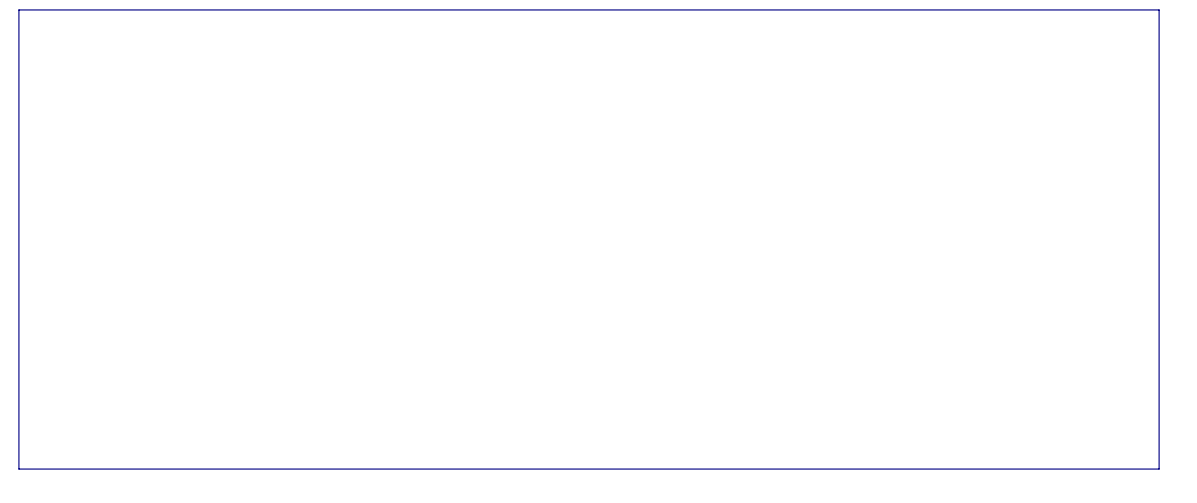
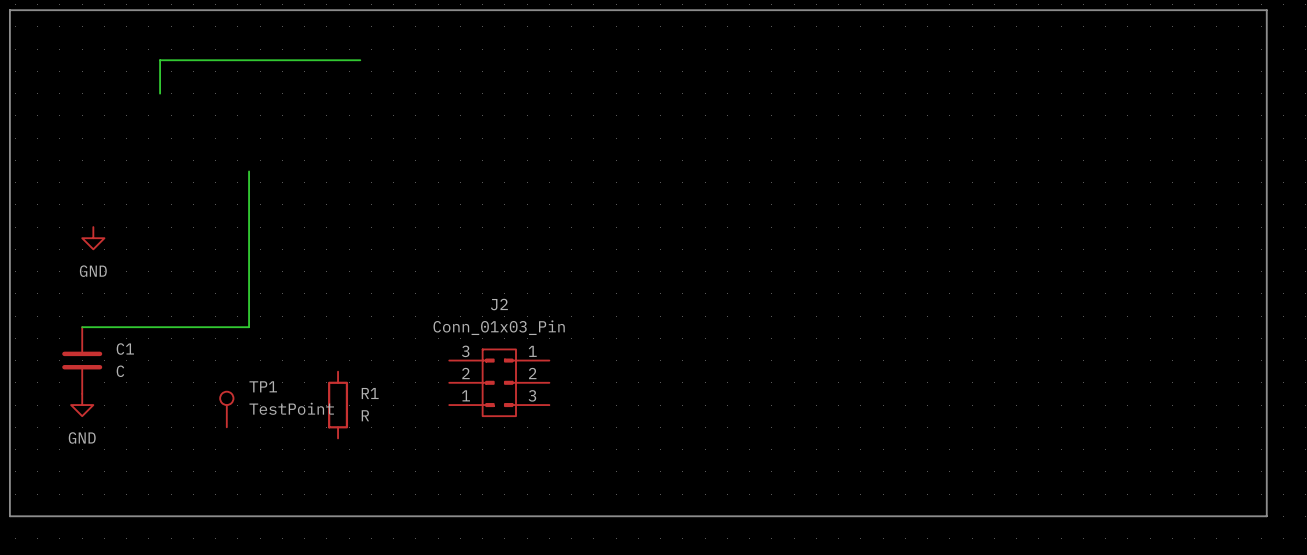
wire: none -> (360, 60) (160, 60) (160, 93)
wire: none -> (249, 171) (249, 327) (82, 327)
power symbol: none -> GND (93, 238)
C1: none -> C (82, 360)
J2: none -> Conn_01x03_Pin (499, 382)
power symbol: none -> GND (82, 405)
R1: none -> R (338, 405)
TP1: none -> TestPoint (226, 409)

